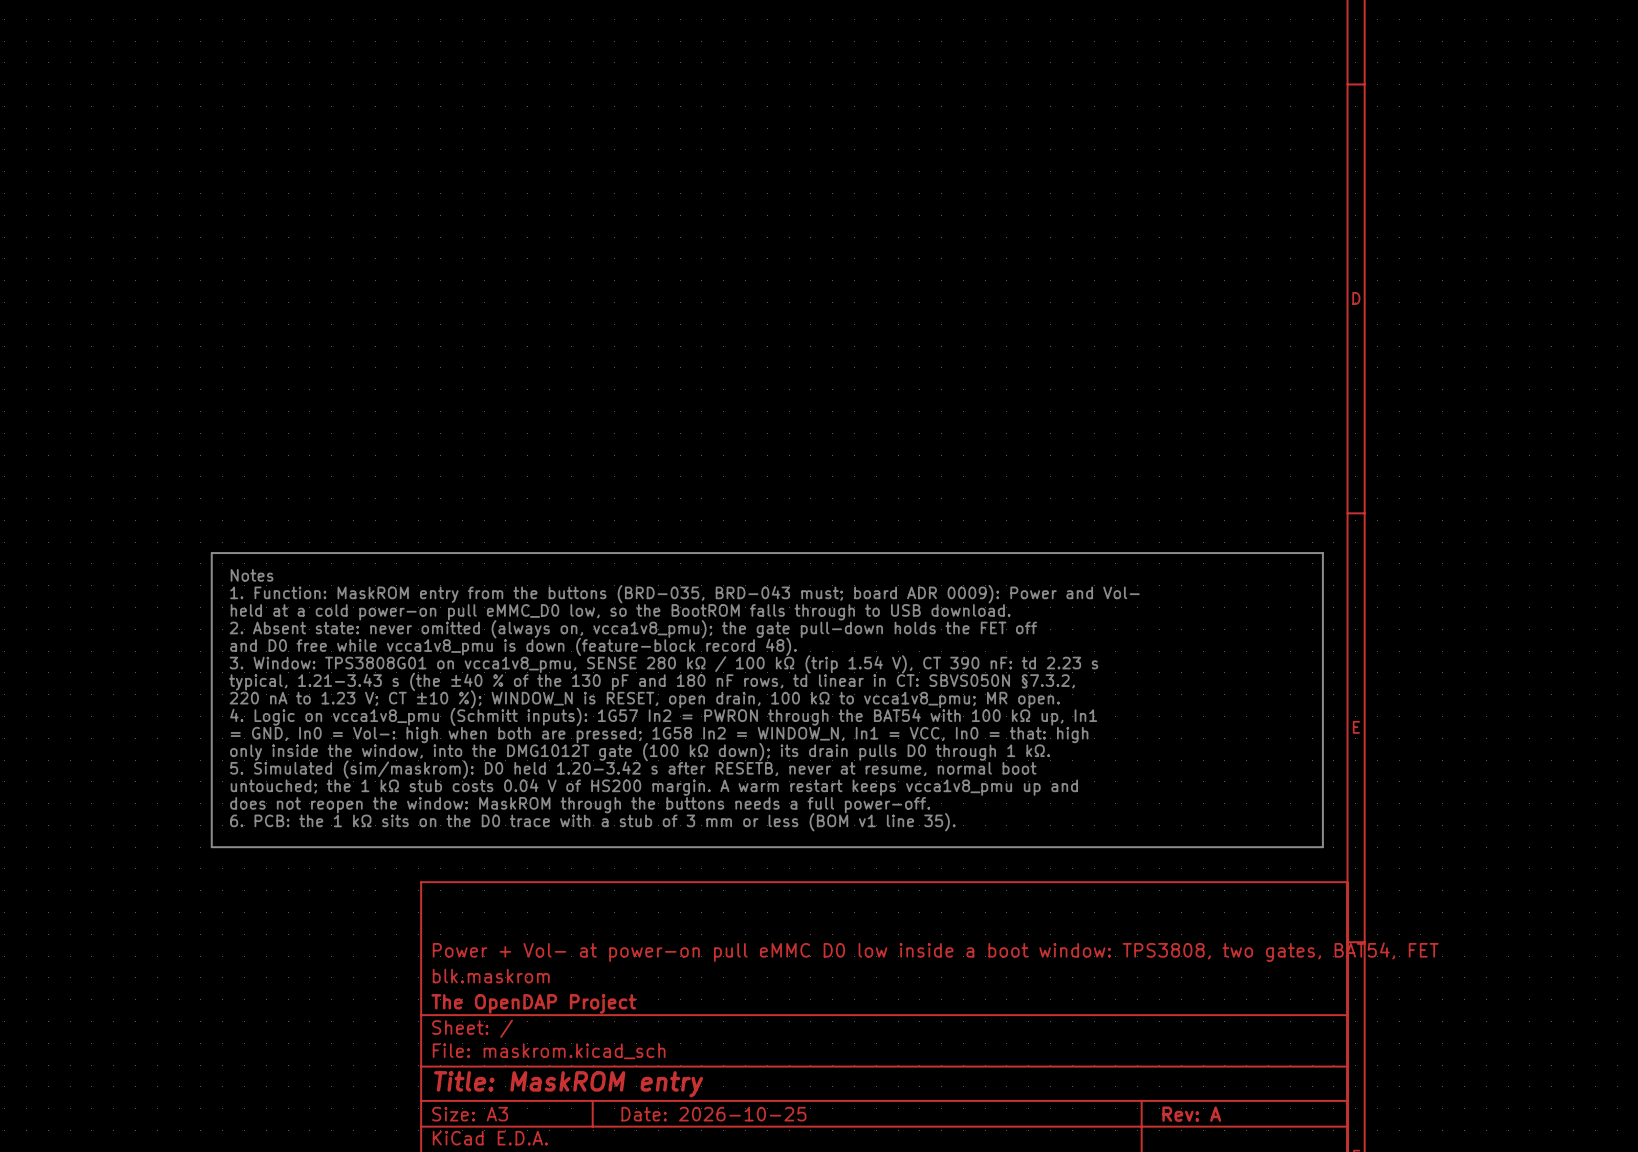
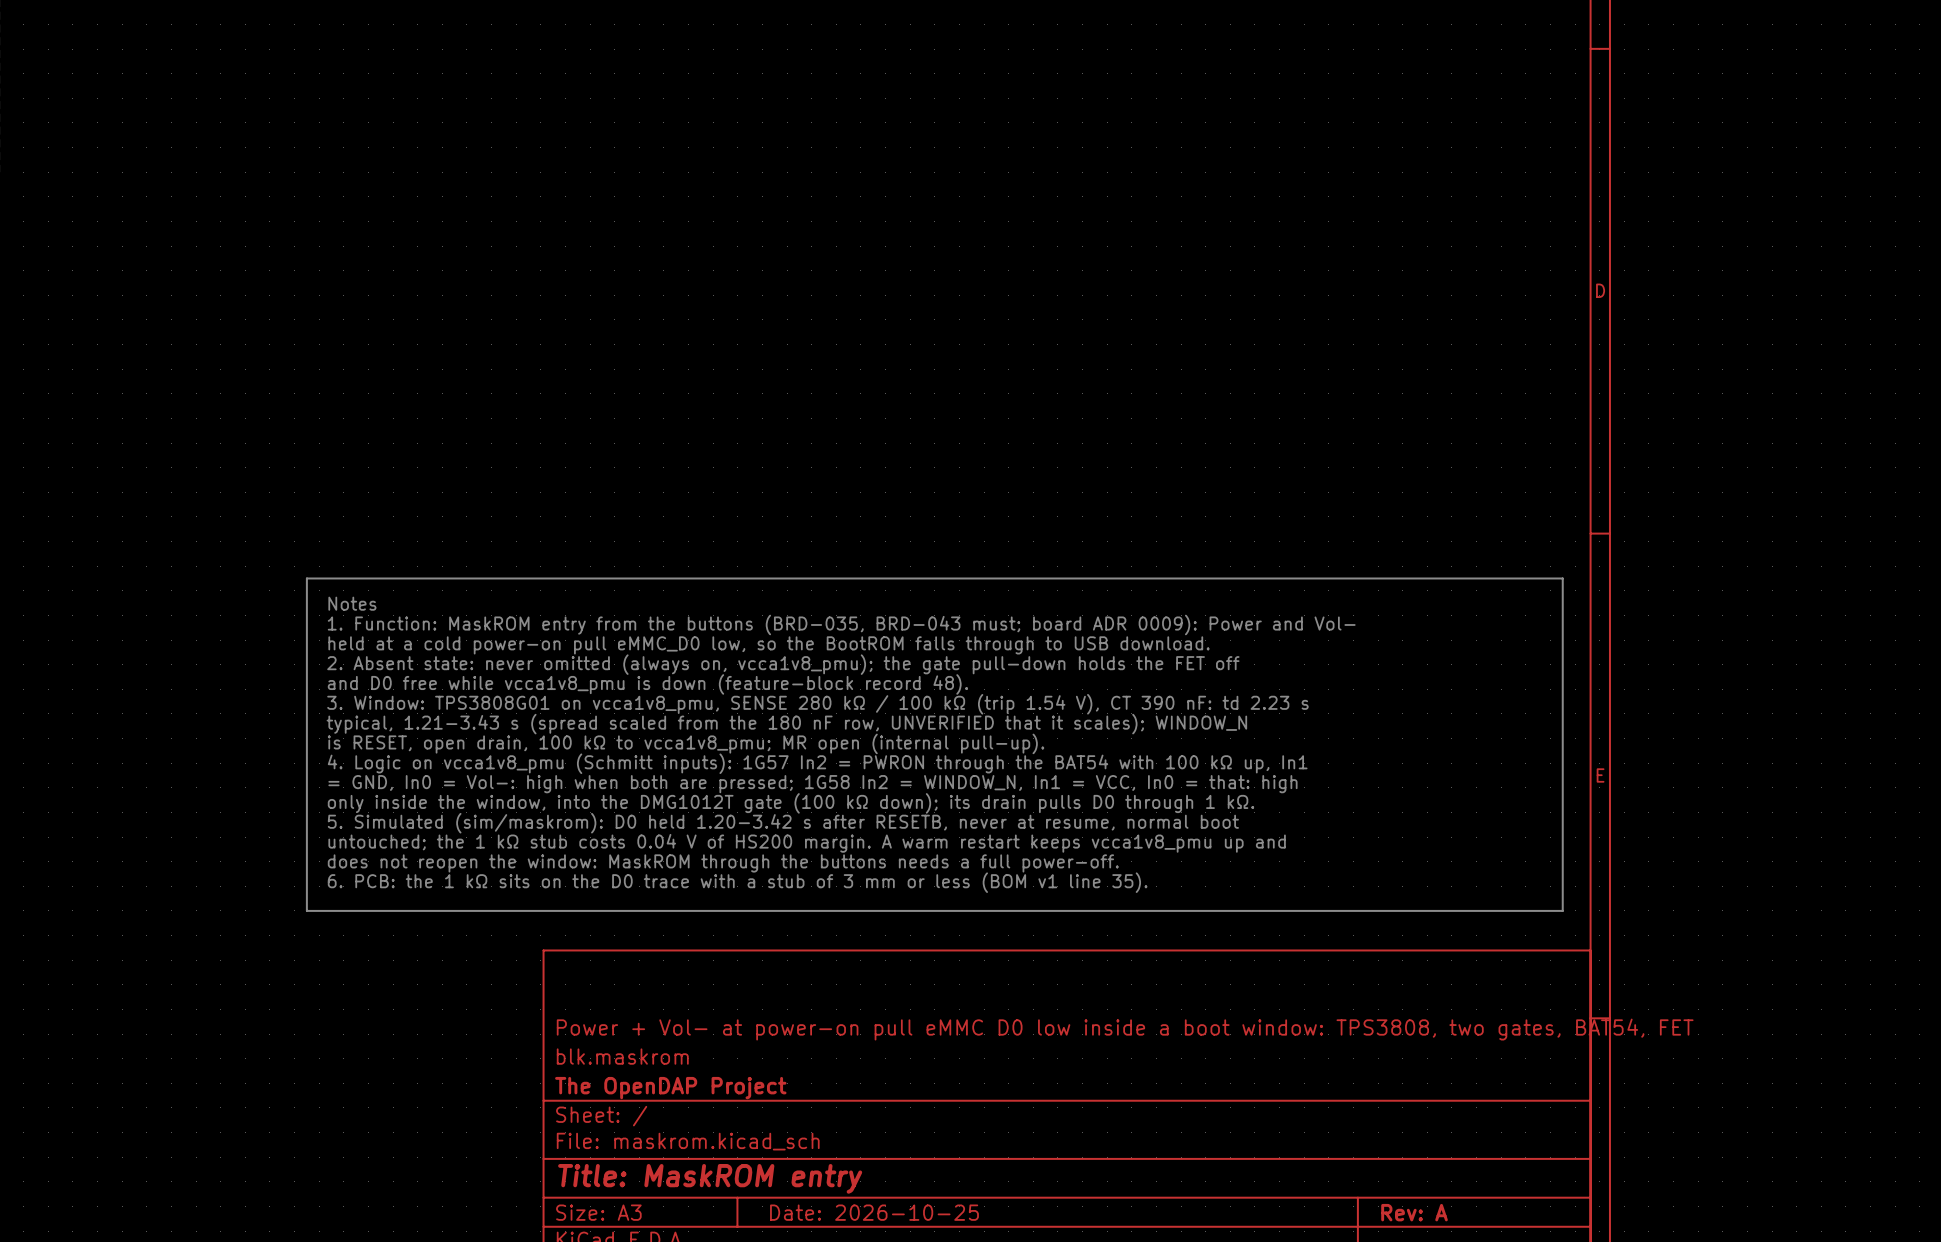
text: typical, 1.21-3.43 s (the ±40 % of the 130 pF and 180 nF rows, td linear in CT: SBVS050N §7.3.2, (652, 681) -> typical, 1.21-3.43 s (spread scaled from the 180 nF row, UNVERIFIED that it scales); WINDOW_N (786, 724)
text: 220 nA to 1.23 V; CT ±10 %); WINDOW_N is RESET, open drain, 100 kΩ to vcca1v8_pmu; MR open. (644, 699) -> is RESET, open drain, 100 kΩ to vcca1v8_pmu; MR open (internal pull-up). (686, 743)

